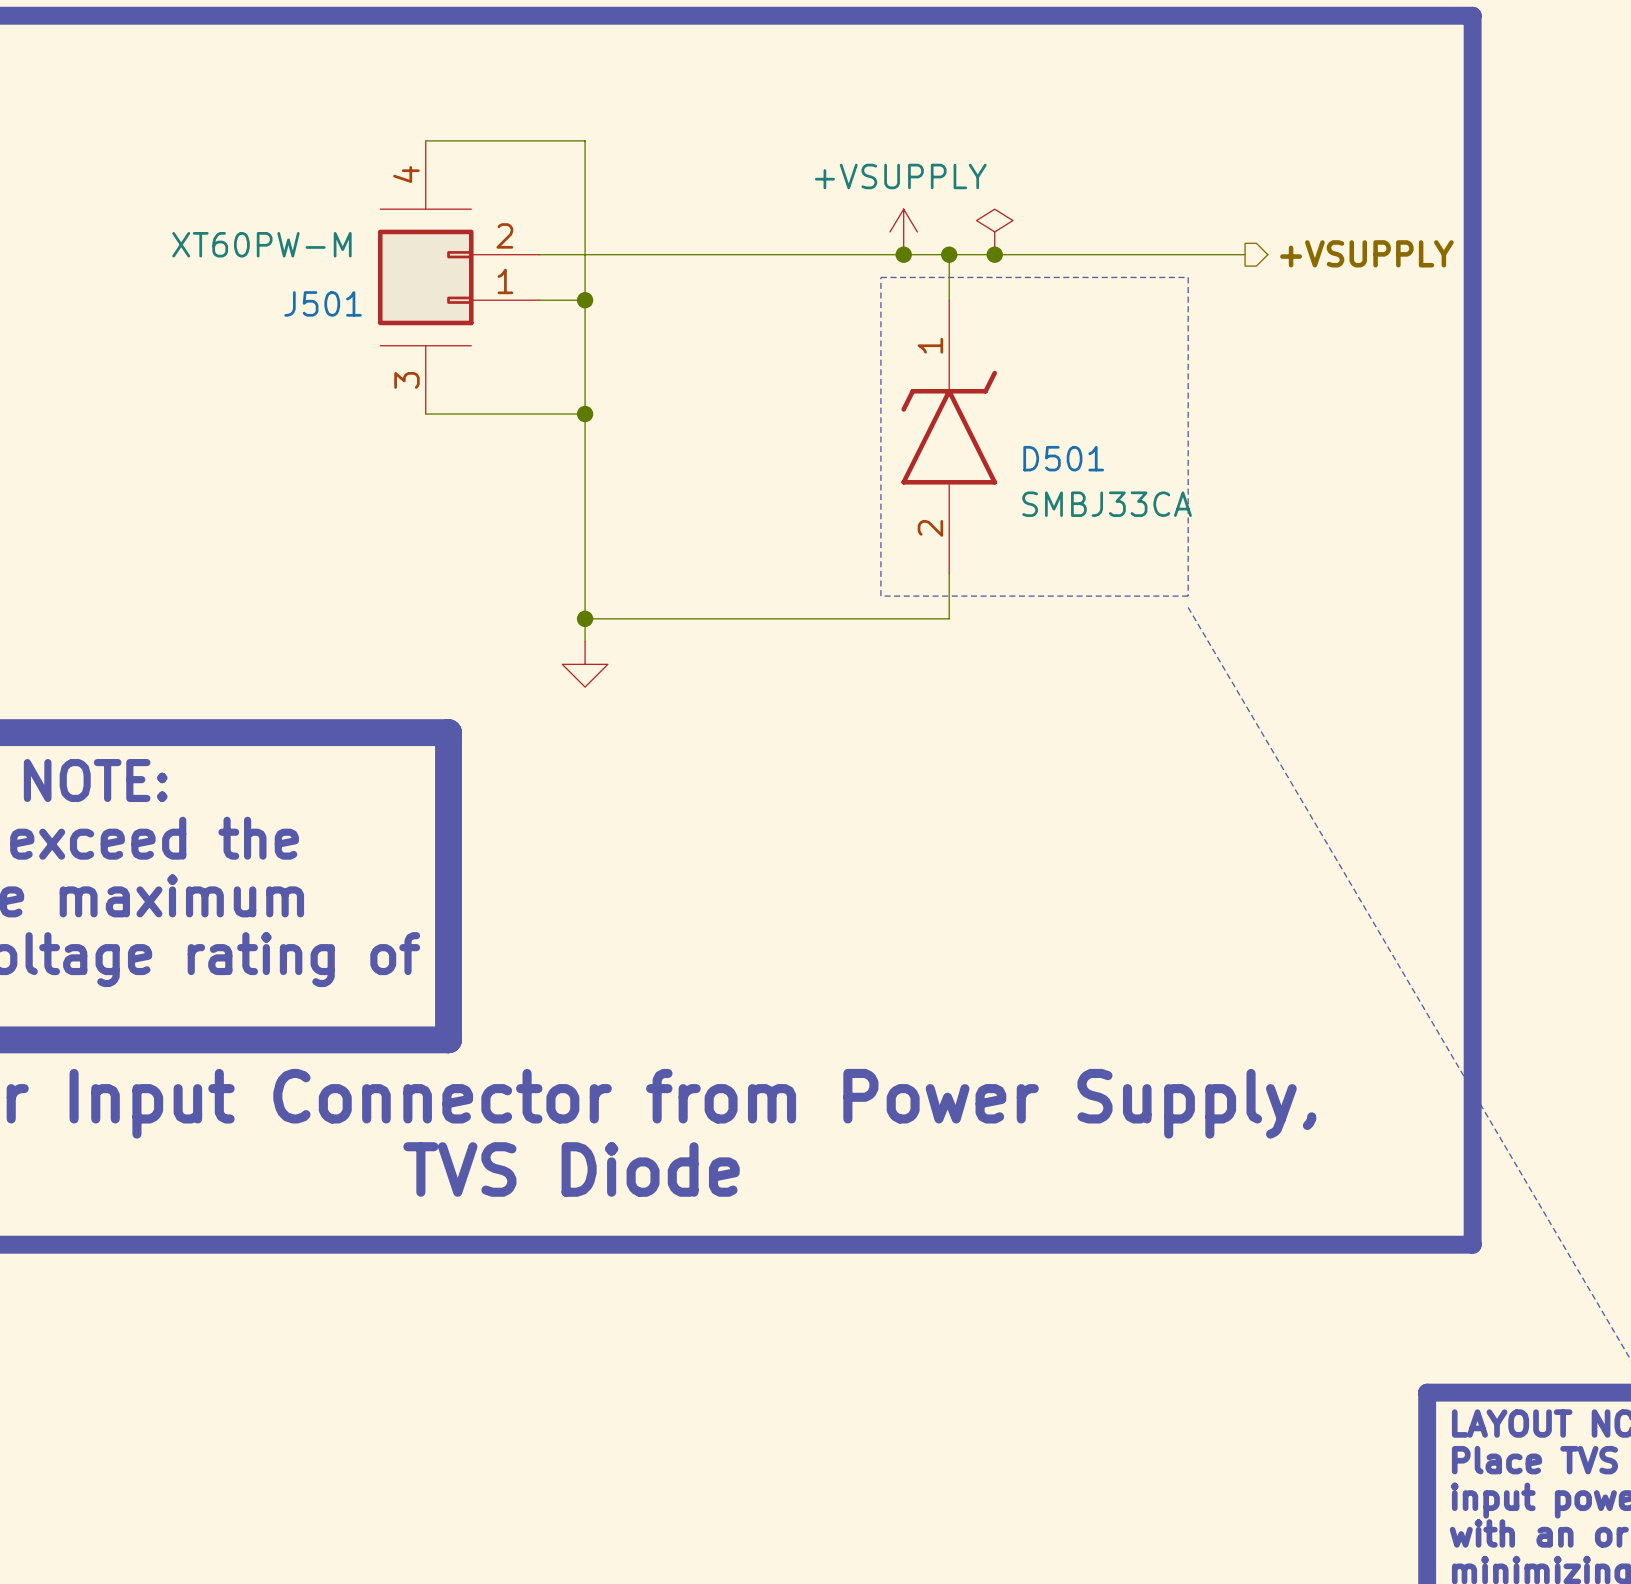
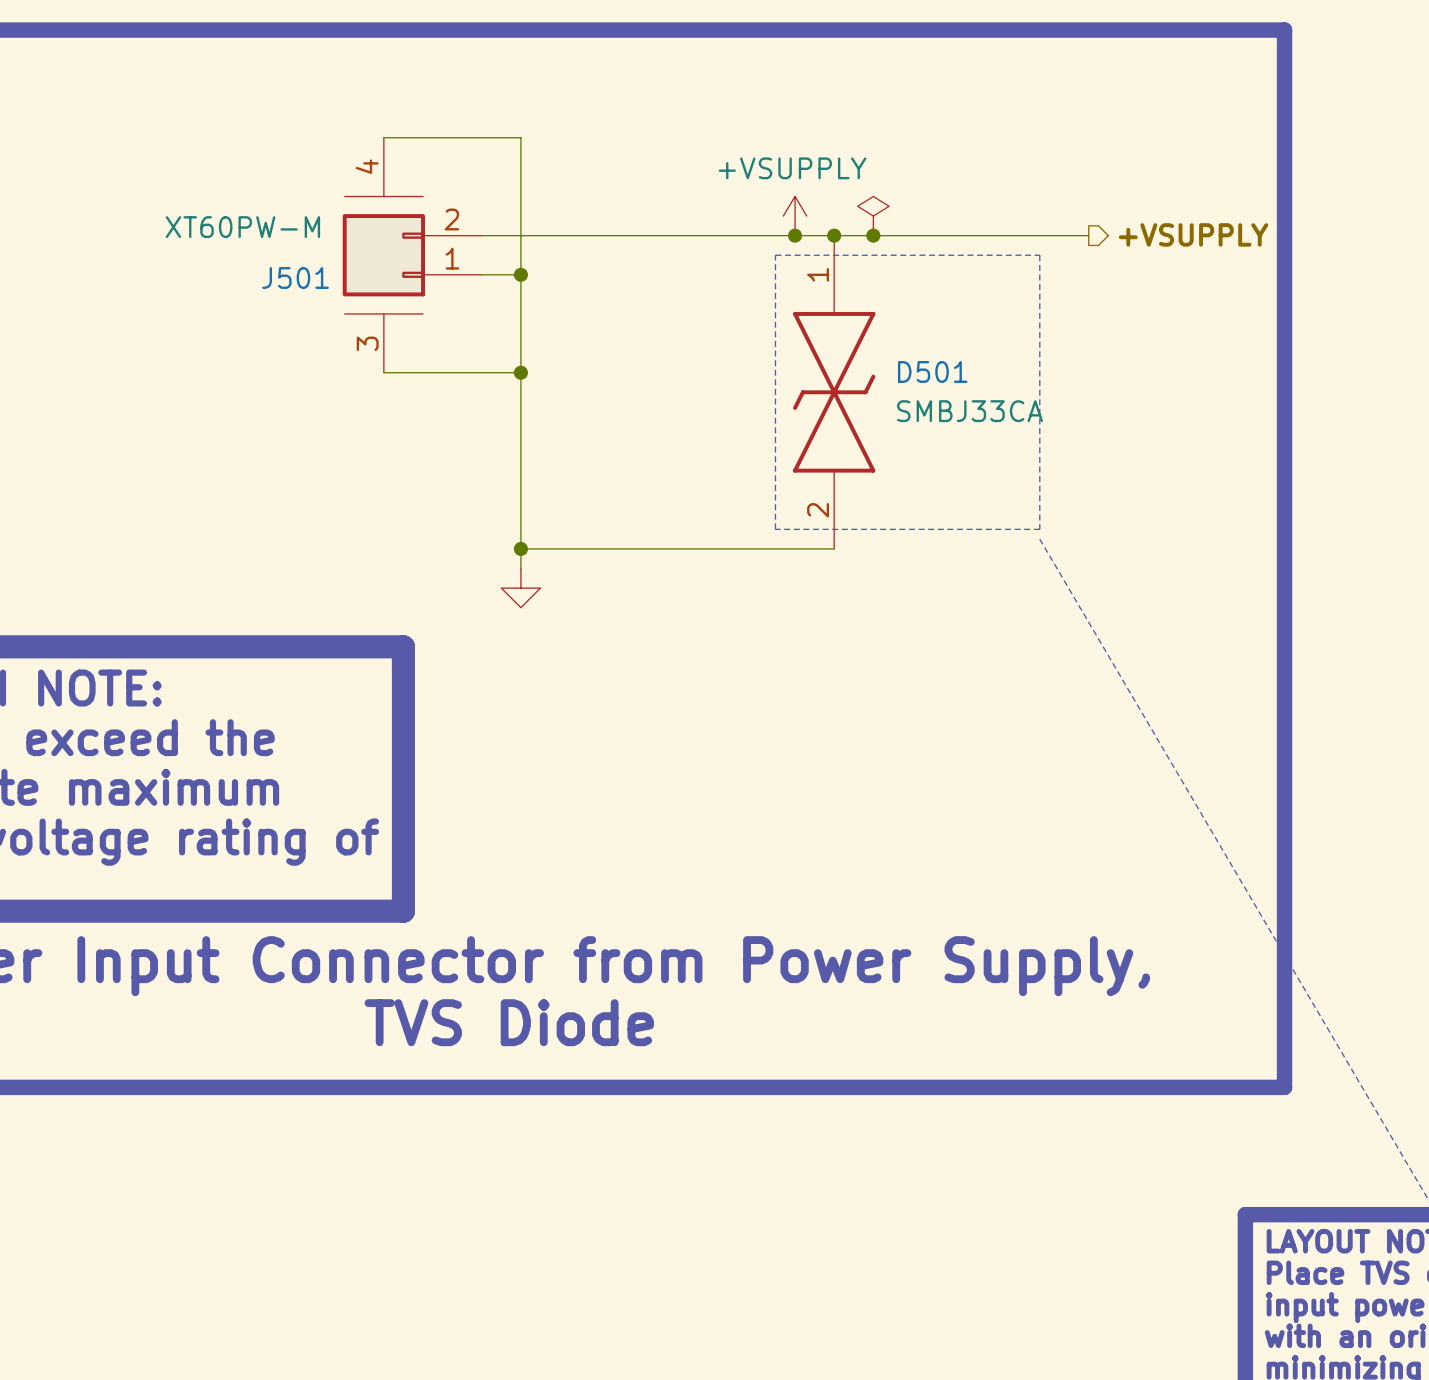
D501 symbol: [901, 300, 998, 574] -> [793, 235, 876, 549]
D501 name position: D501 (1063, 458) -> D501 (932, 371)
D501 value position: SMBJ33CA (1107, 504) -> SMBJ33CA (970, 411)

